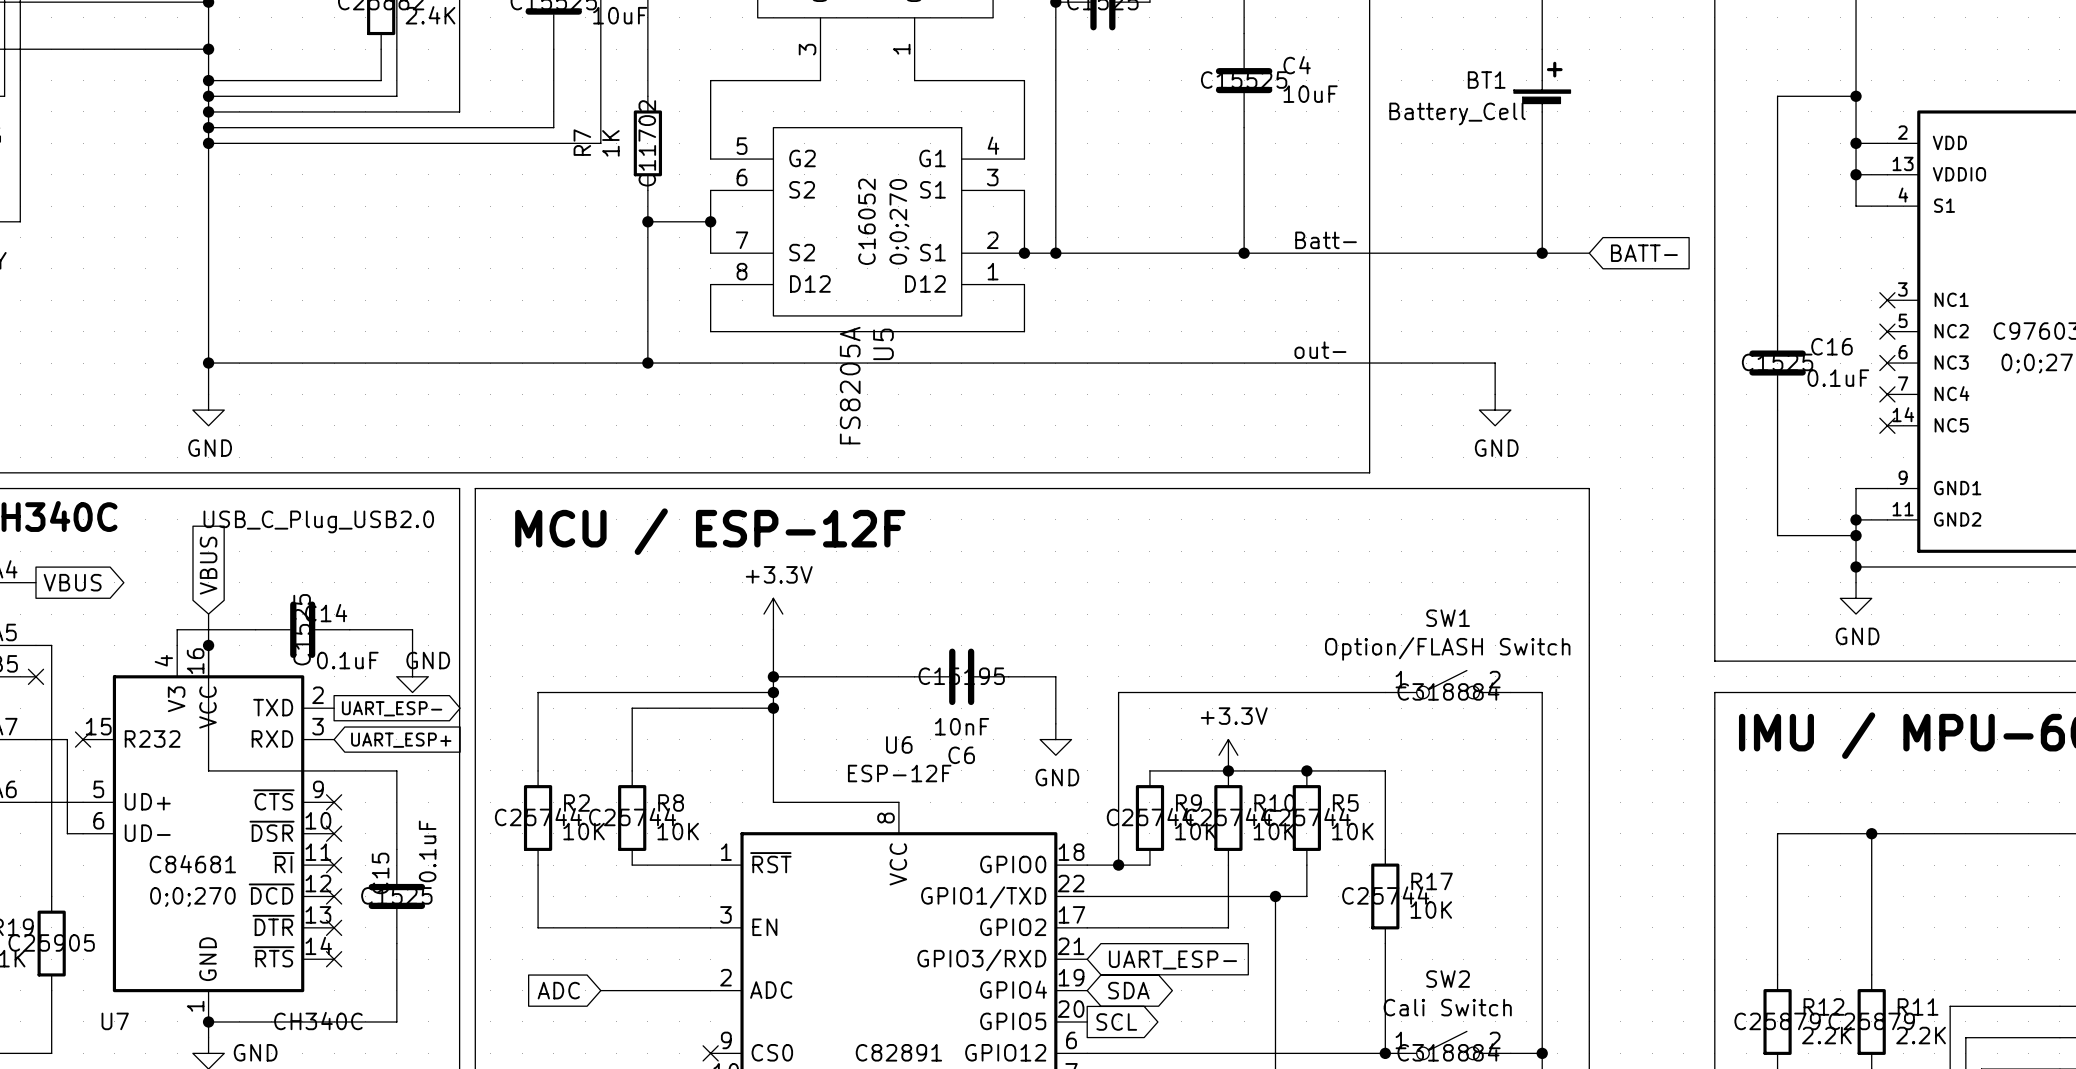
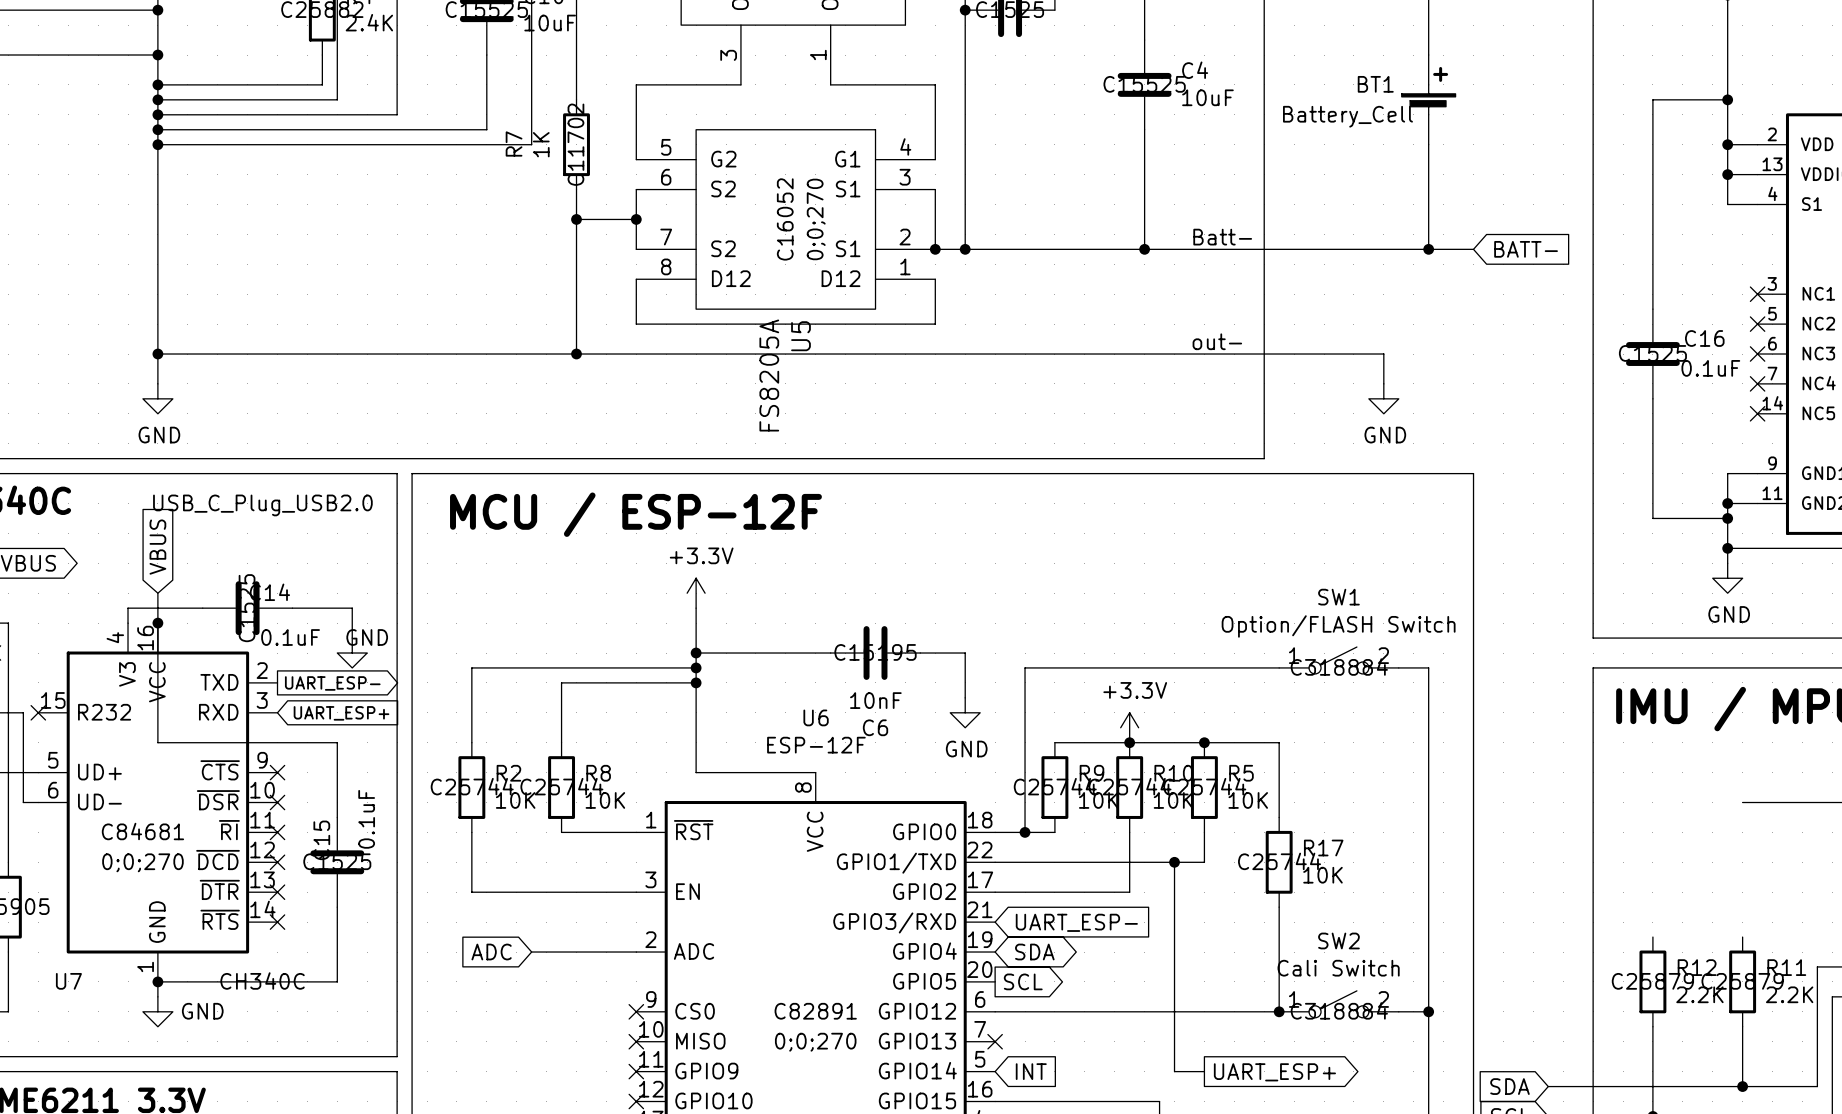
junction: (1871, 833) -> none
wire: (1777, 974) (1777, 833) (1871, 833) (1871, 974) -> none

